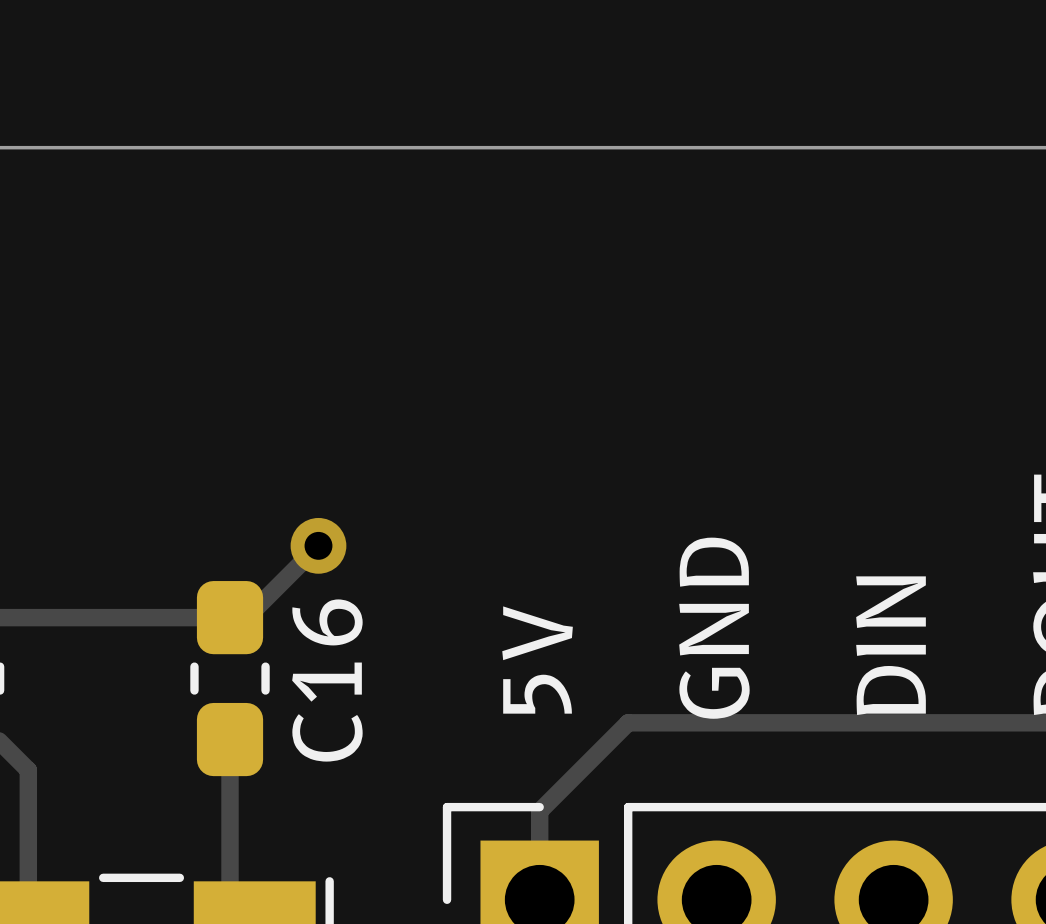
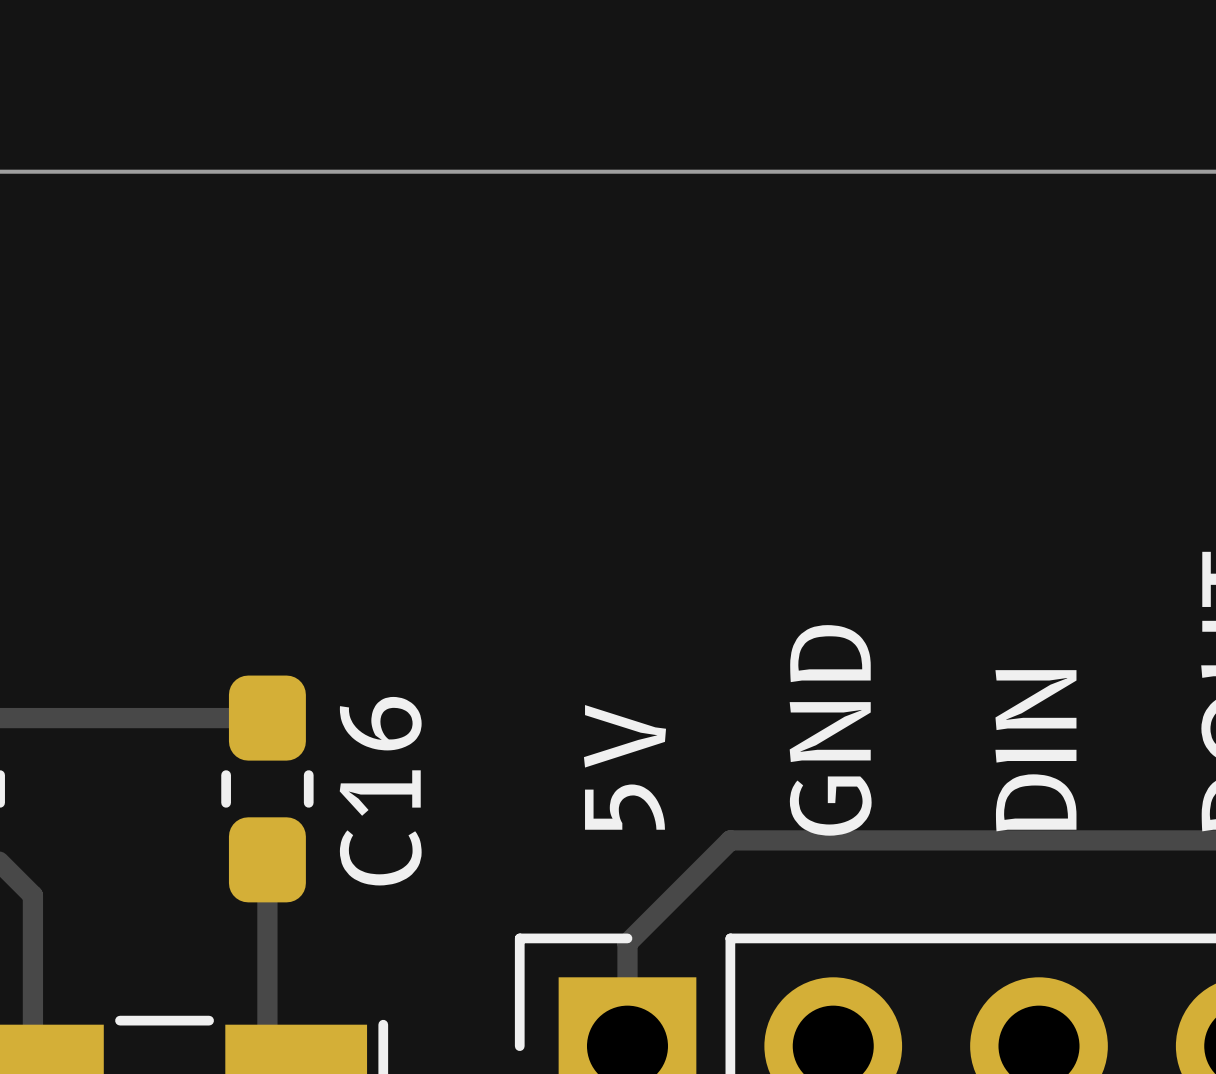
track: (318, 545) (246, 617) -> none
via: (318, 545) -> none

